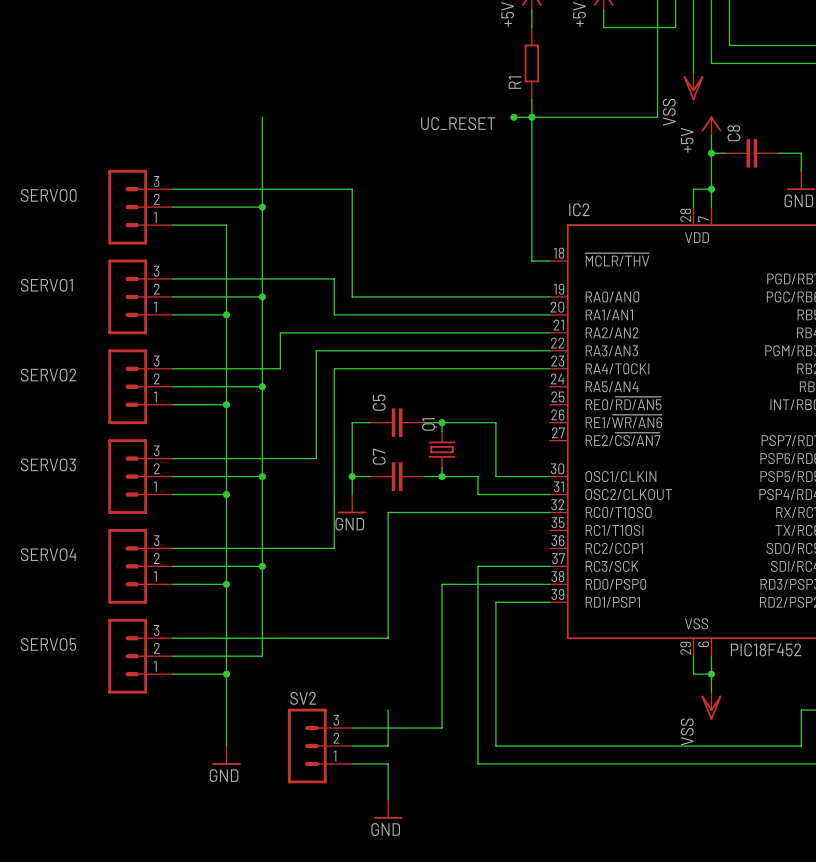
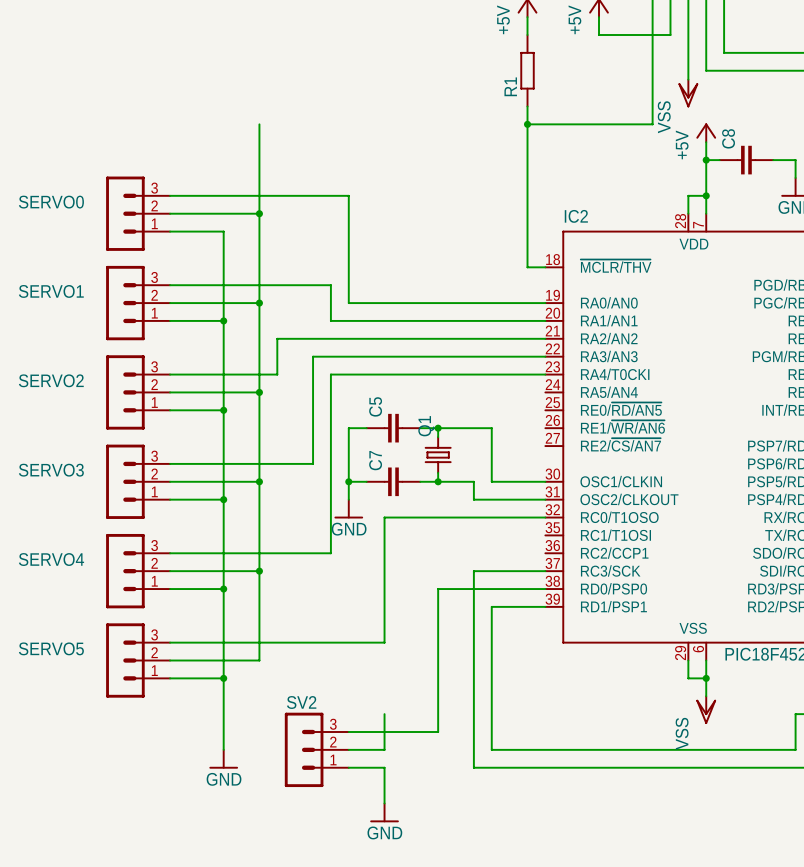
wire: (513, 117) (531, 117) -> none
junction: (513, 117) -> none
label: UC_RESET (458, 123) -> none

